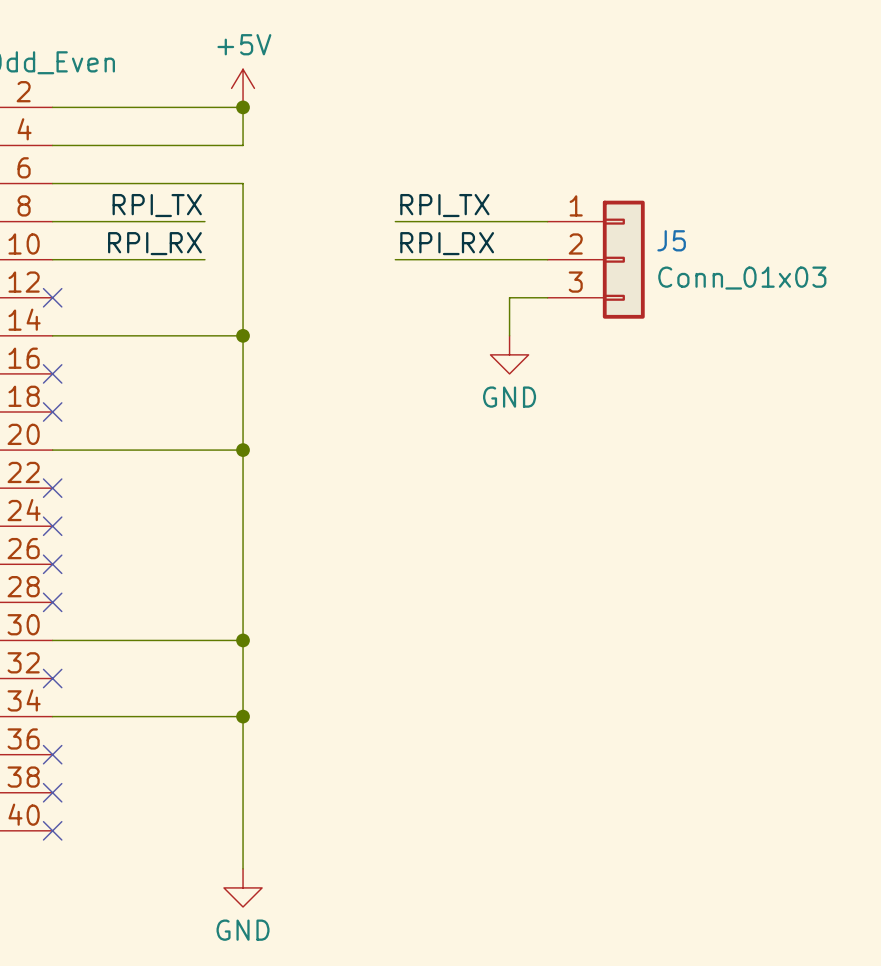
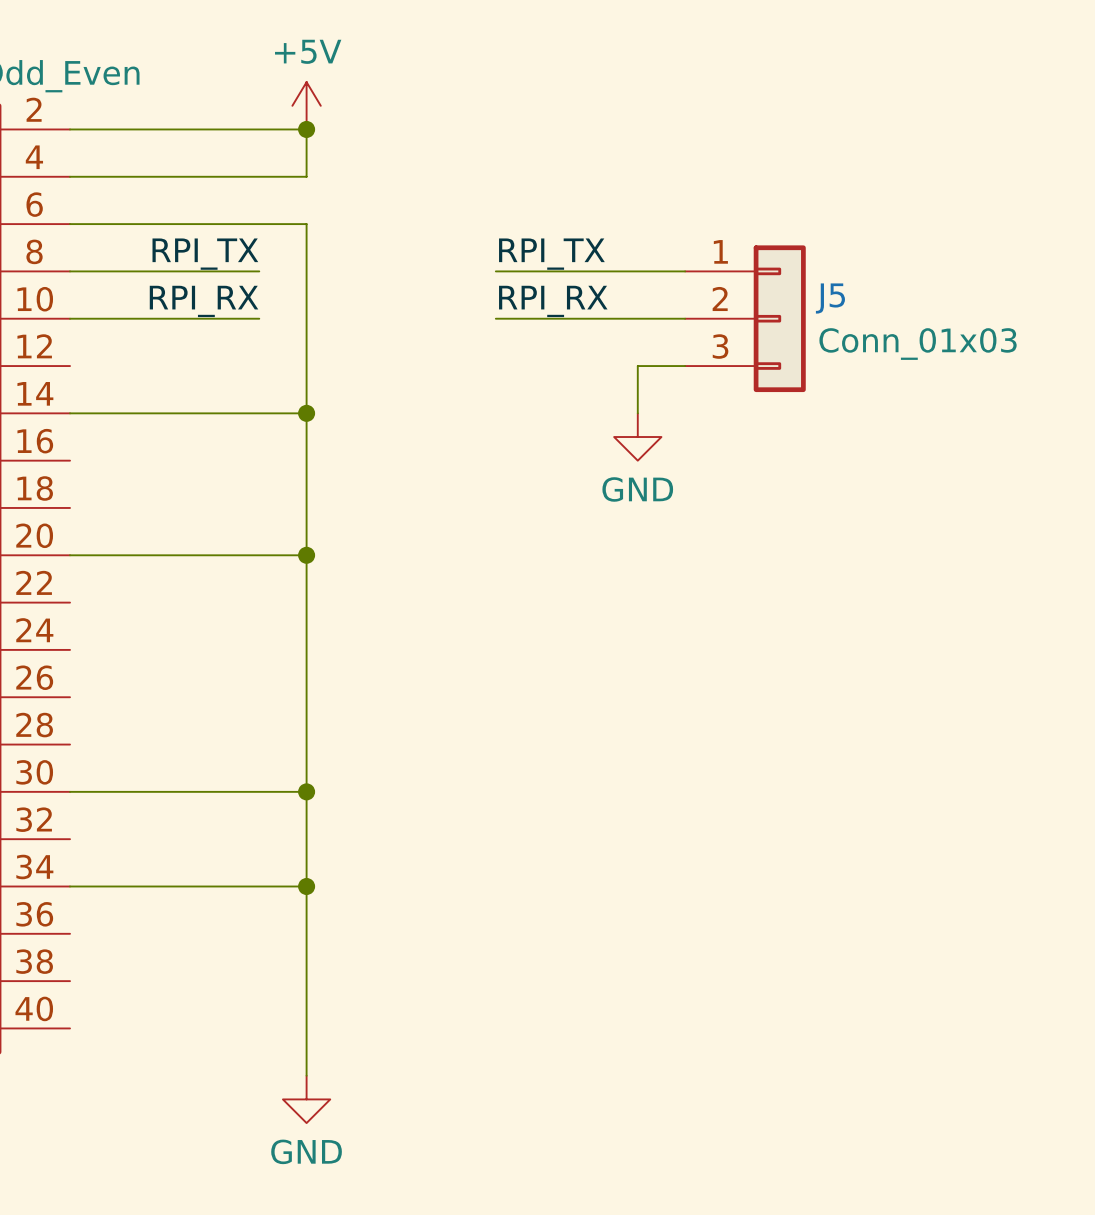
no-connect mark: (52, 297) -> none
no-connect mark: (52, 373) -> none
no-connect mark: (52, 412) -> none
no-connect mark: (52, 488) -> none
no-connect mark: (52, 526) -> none
no-connect mark: (52, 564) -> none
no-connect mark: (52, 602) -> none
no-connect mark: (52, 678) -> none
no-connect mark: (52, 754) -> none
no-connect mark: (52, 792) -> none
no-connect mark: (52, 830) -> none

